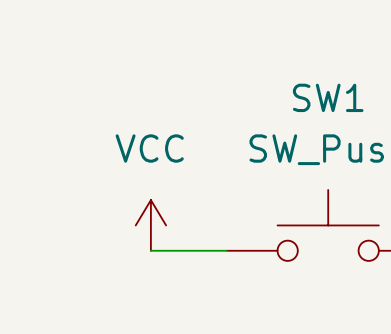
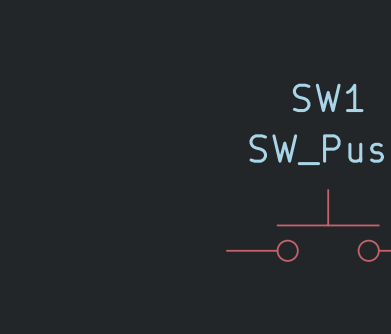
power symbol: VCC (150, 225) -> none
wire: (150, 250) (226, 250) -> none

